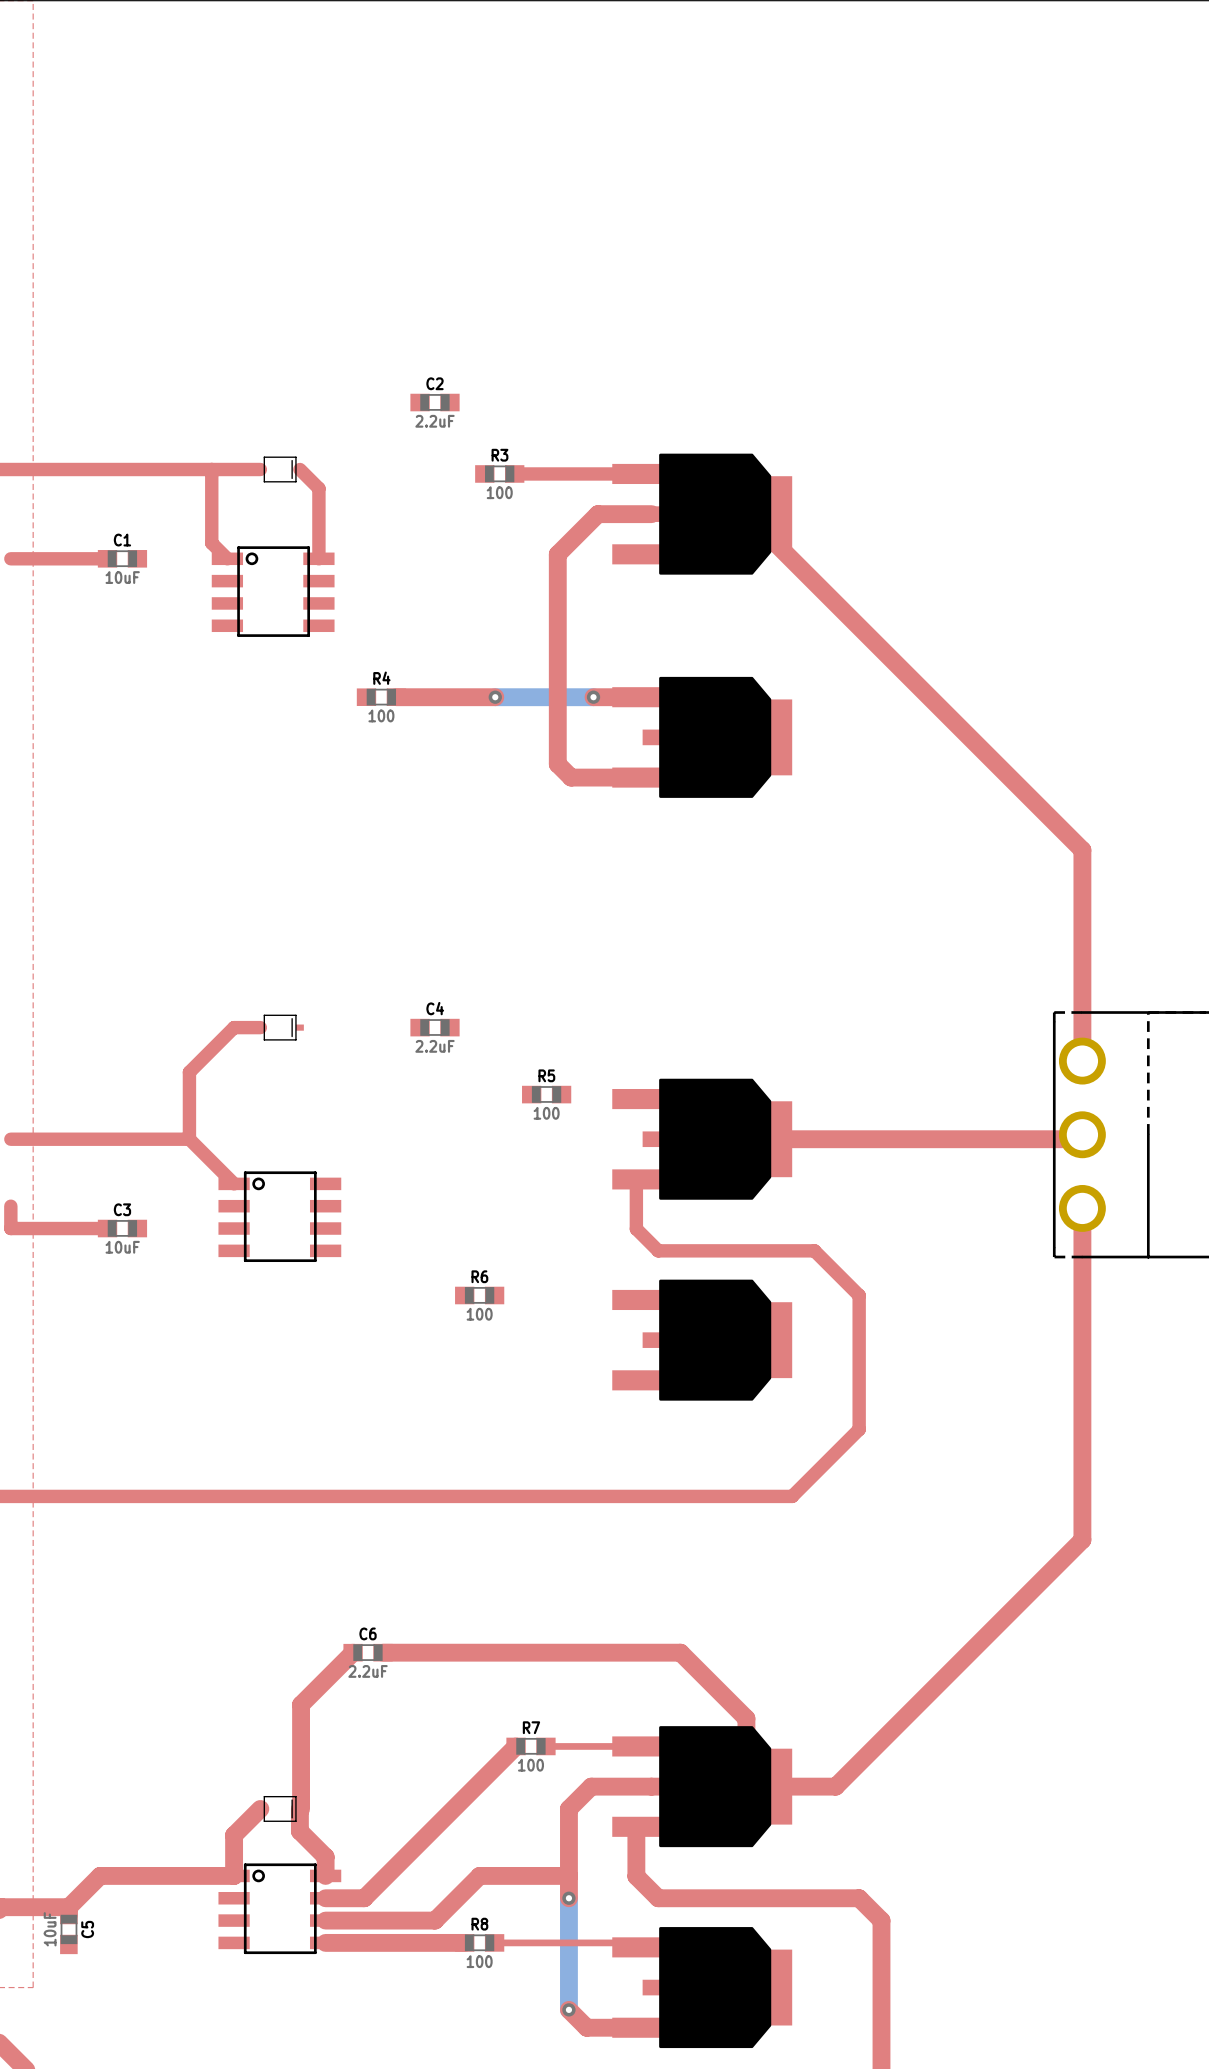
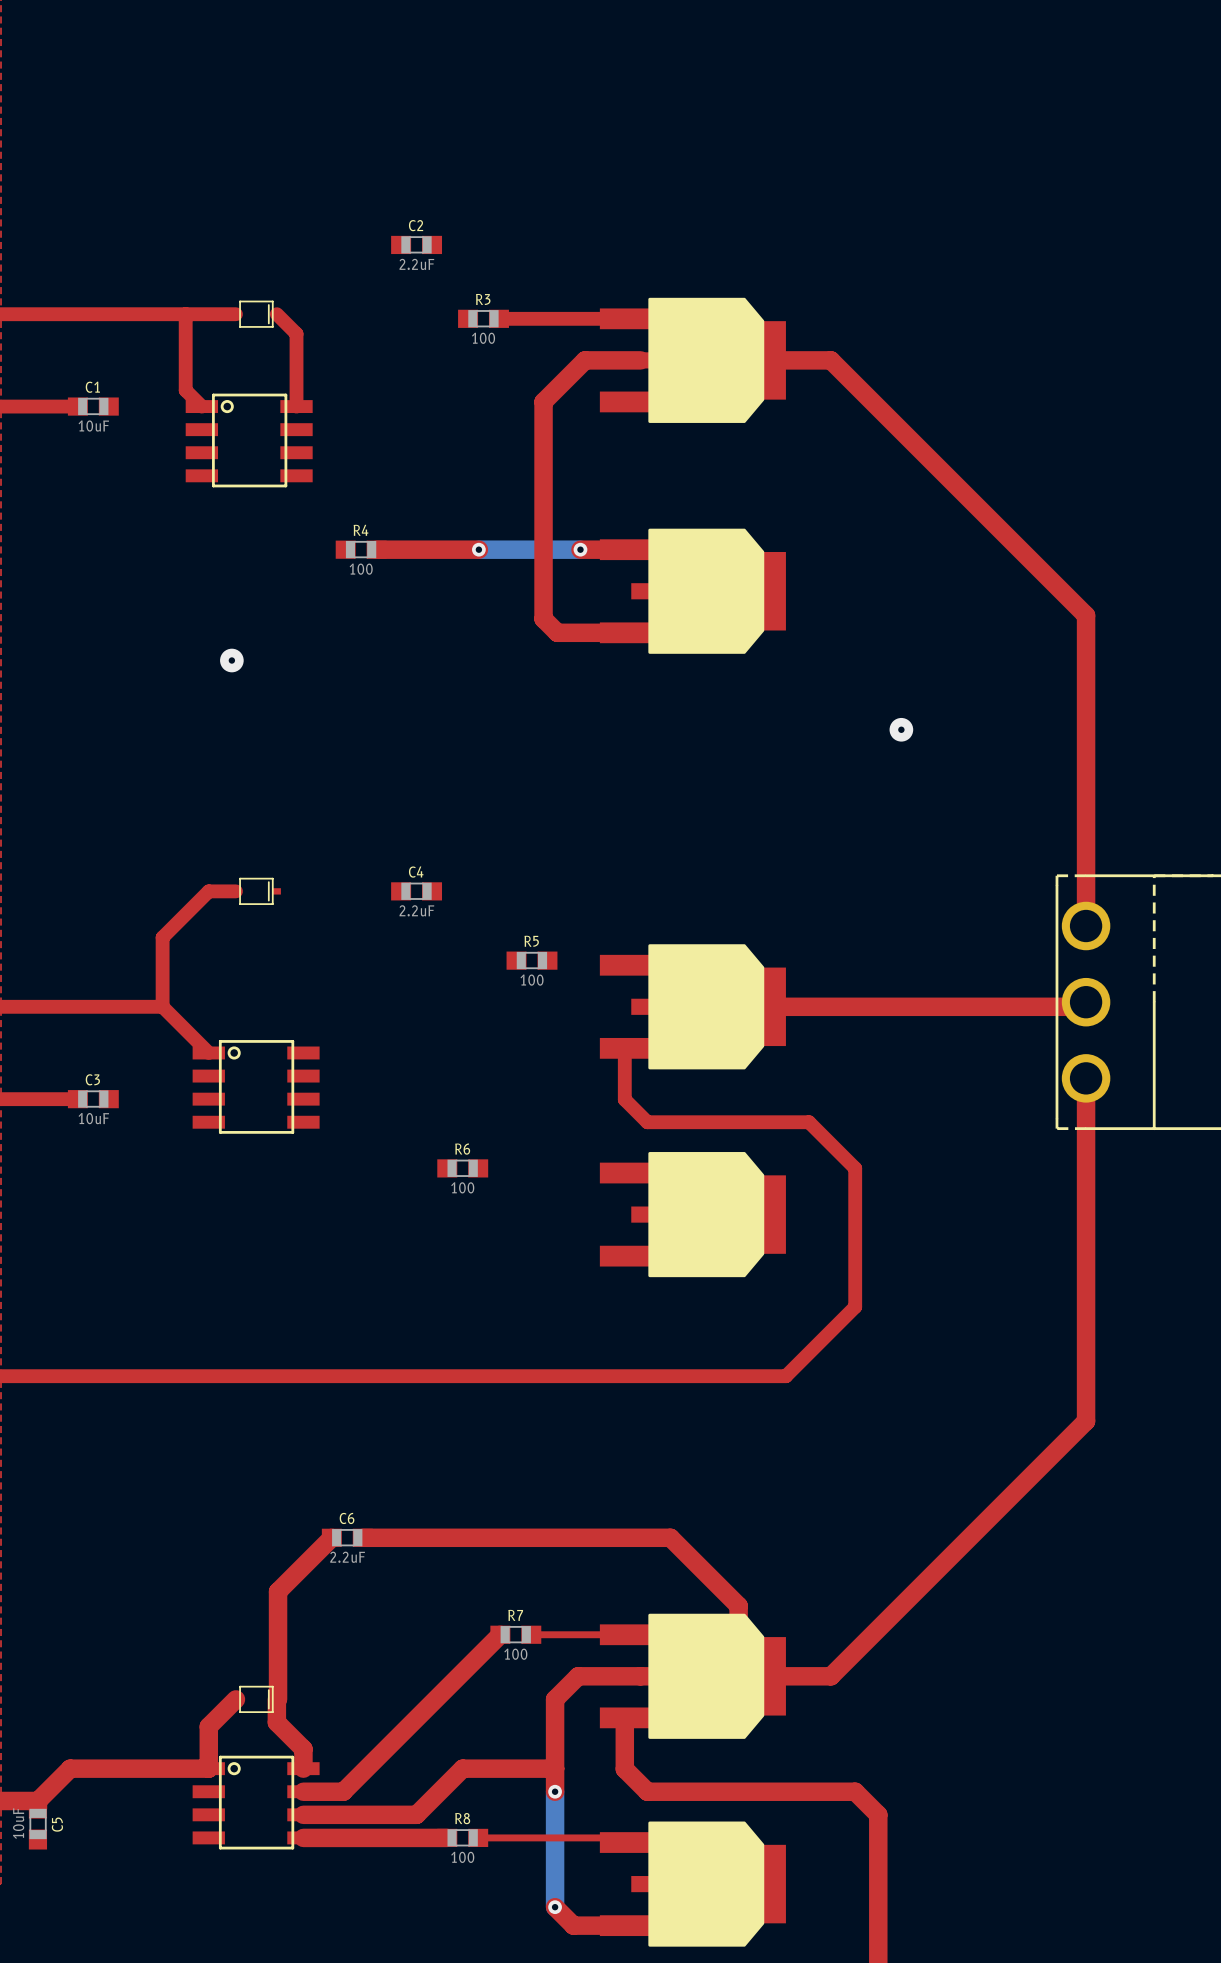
top track: (746, 514) (1082, 850) -> (738, 360) (830, 360) (1086, 615) (1086, 707)
via: none -> (231, 660)
via: none -> (901, 729)

